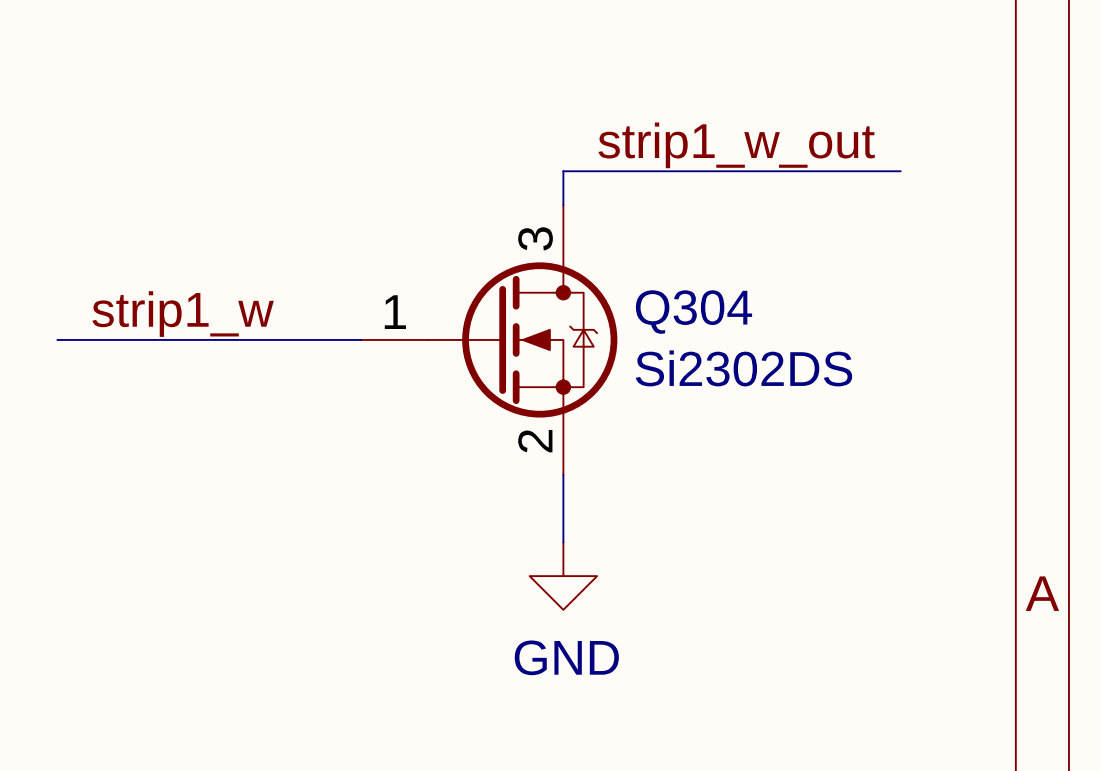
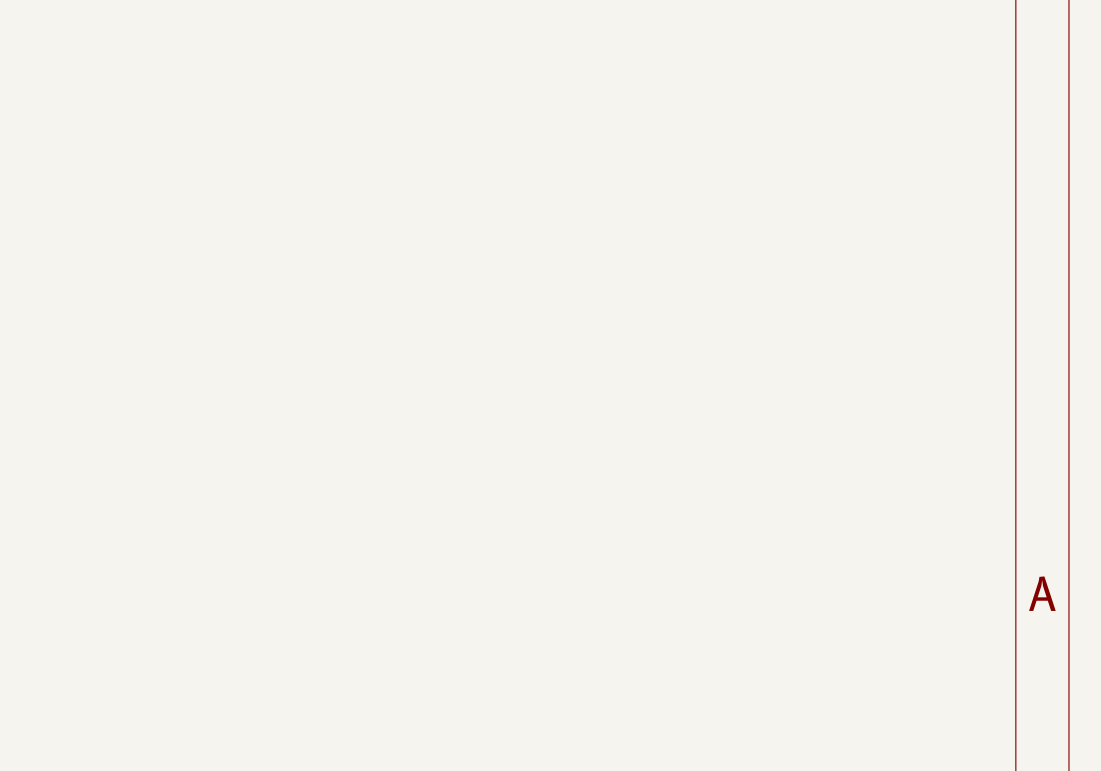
label: strip1_w_out (736, 145) -> none
wire: (900, 171) (563, 171) (563, 205) -> none
label: strip1_w (183, 314) -> none
wire: (57, 339) (360, 339) -> none
Q304: Si2302DS (489, 339) -> none
wire: (563, 474) (563, 542) -> none
power symbol: GND (563, 576) -> none

